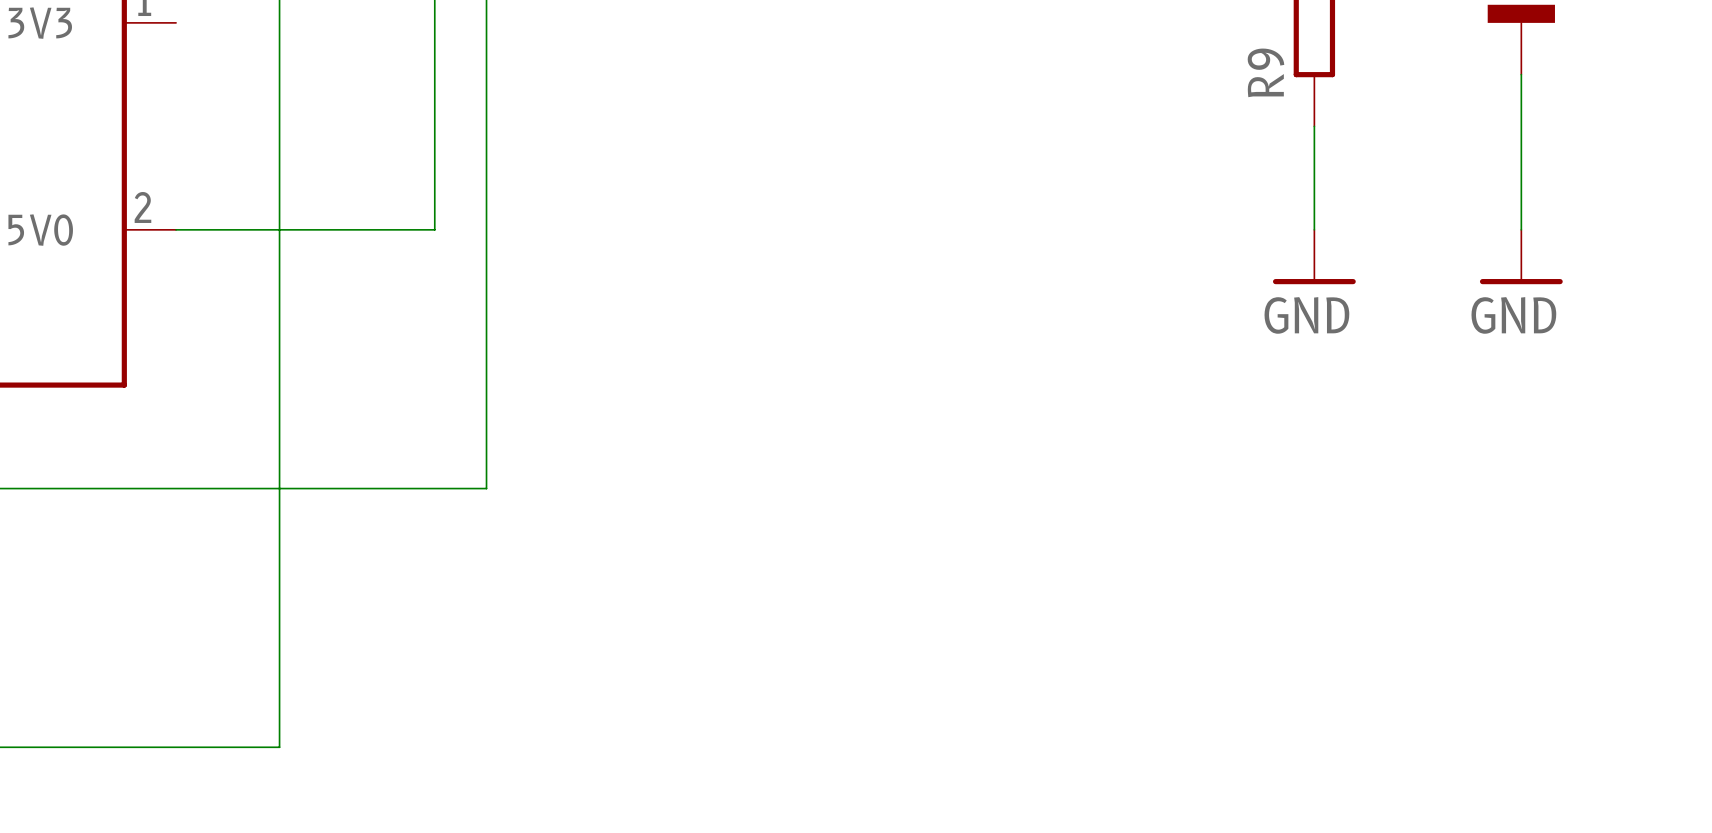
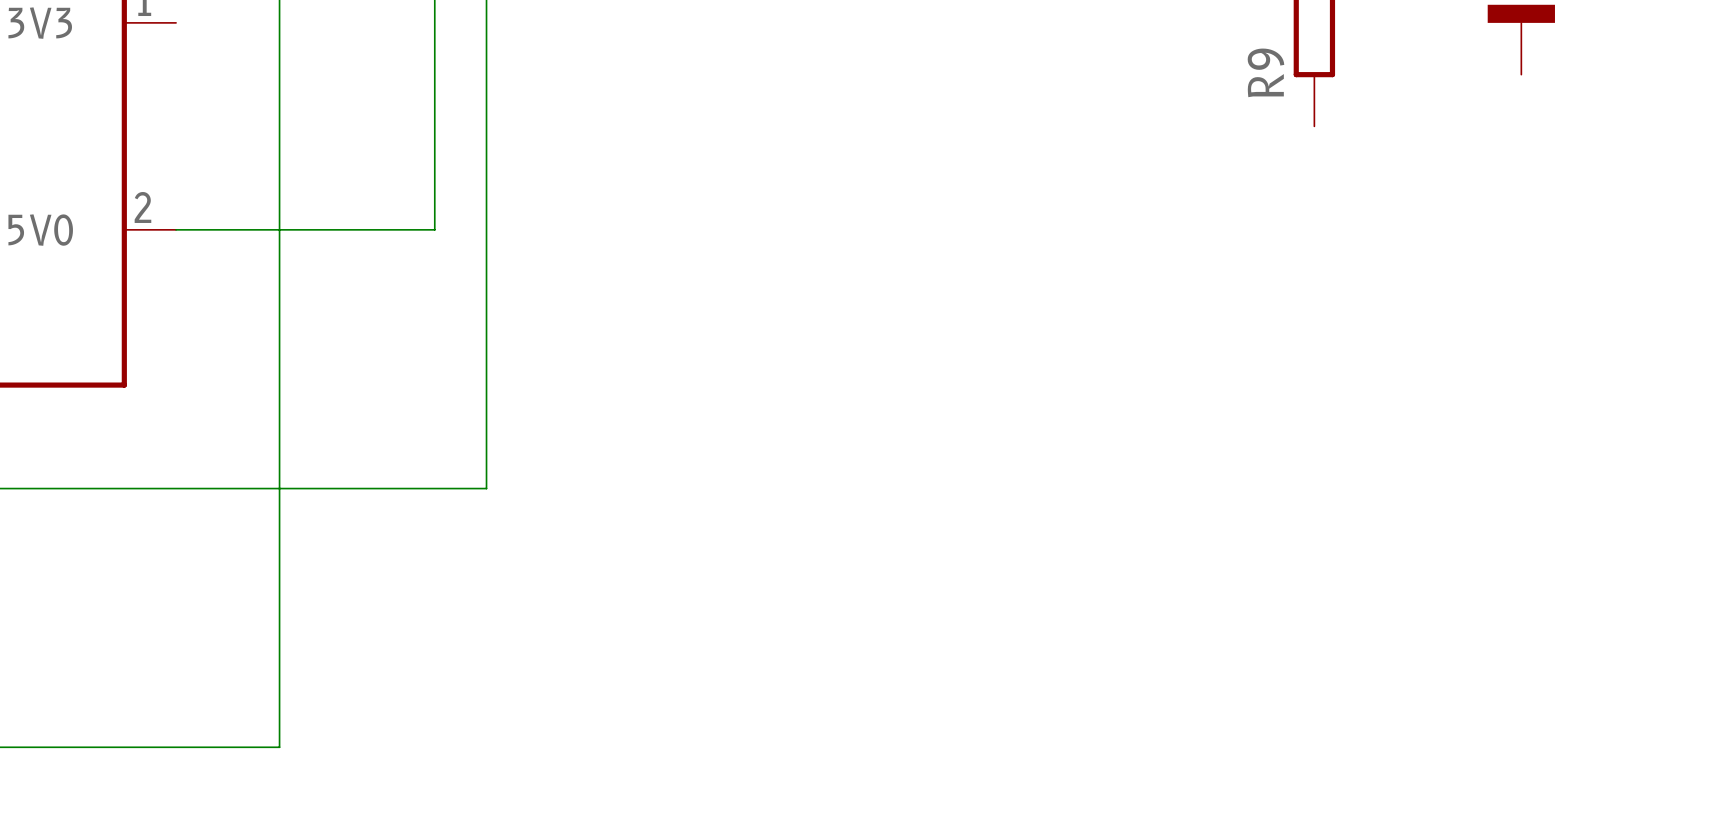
wire: (1521, 74) (1521, 229) -> none
wire: (1314, 126) (1314, 229) -> none
power symbol: GND (1314, 257) -> none
power symbol: GND (1521, 257) -> none

